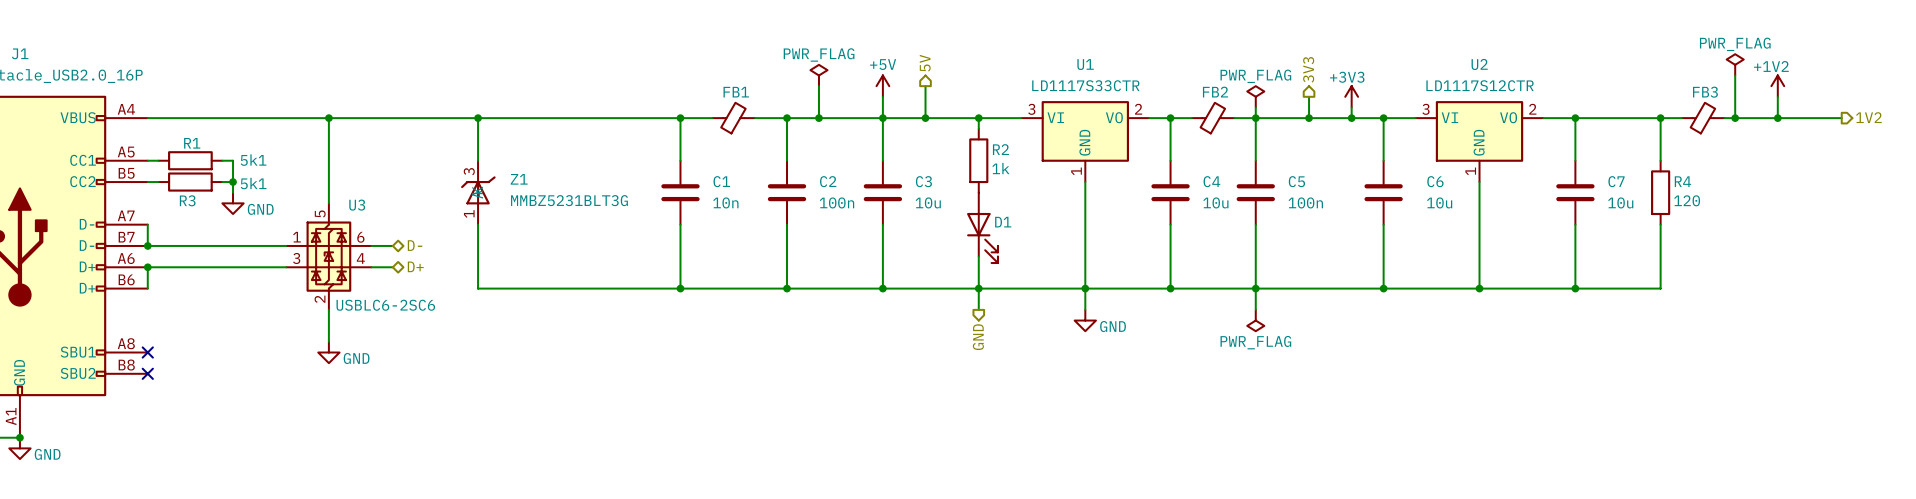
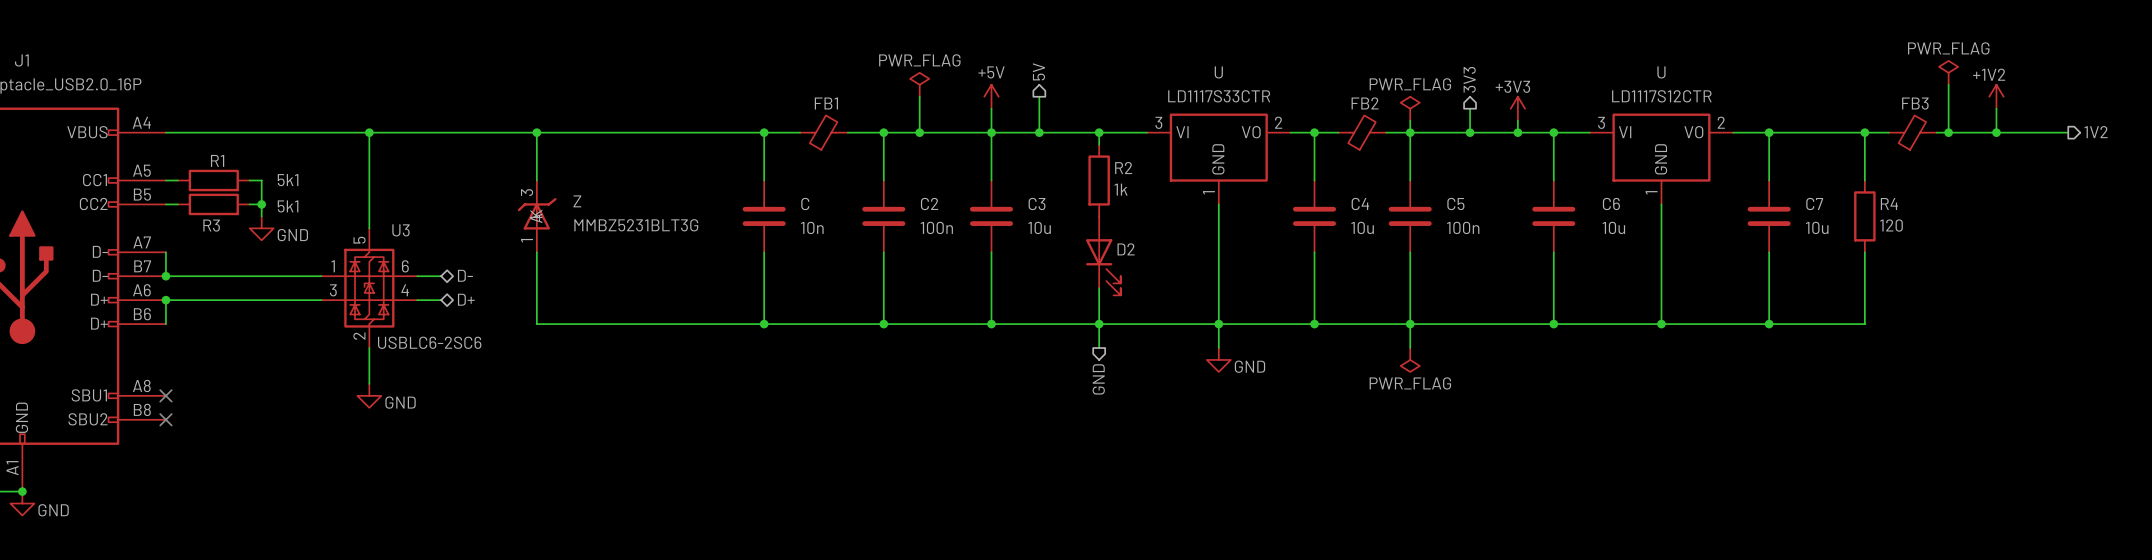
U1 name: U1 (1085, 64) -> U (1218, 72)
U2 name: U2 (1479, 64) -> U (1661, 72)
Z1 name: Z1 (519, 179) -> Z (577, 201)
C1 name: C1 (721, 181) -> C (805, 203)
D1 name: D1 (1003, 222) -> D2 (1126, 249)

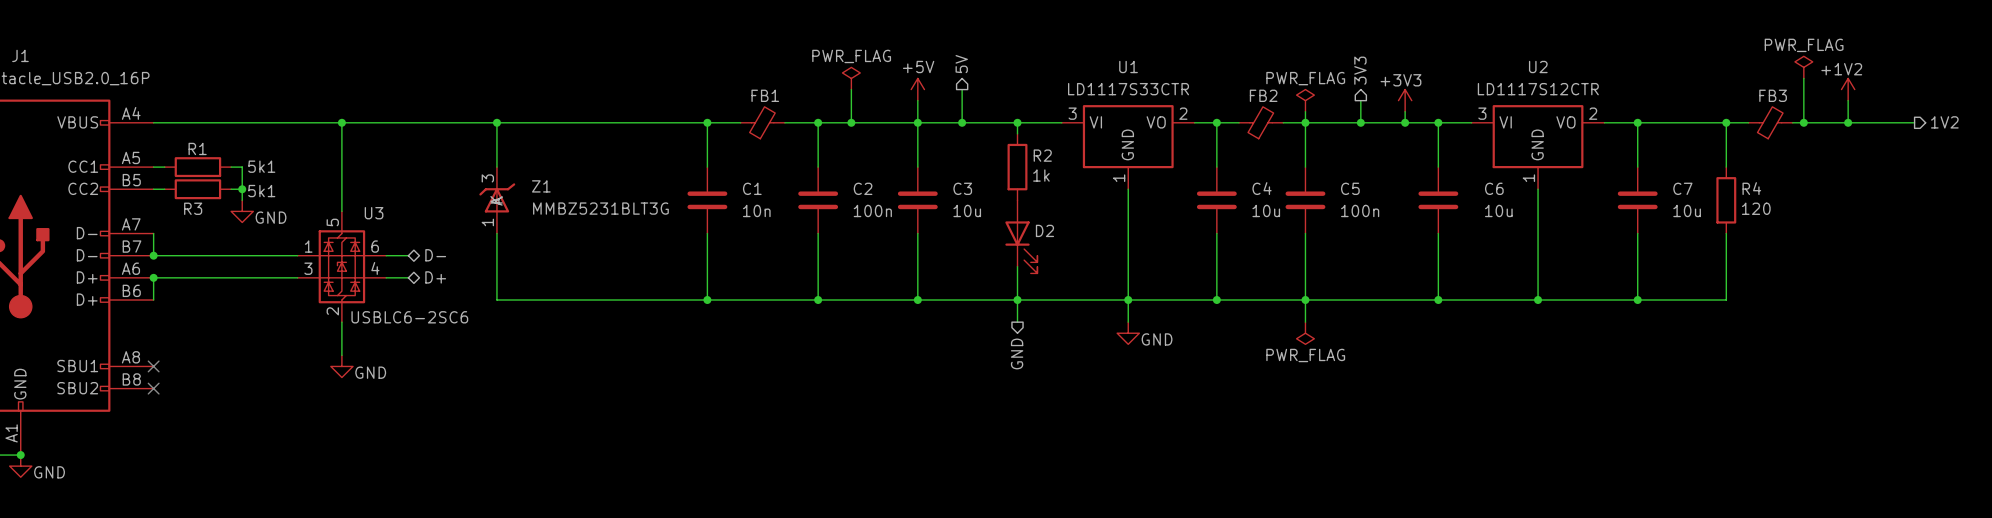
U name: U (1218, 72) -> U1 (1128, 67)
U name: U (1661, 72) -> U2 (1538, 67)
Z name: Z (577, 201) -> Z1 (541, 186)
C name: C (805, 203) -> C1 (752, 188)

